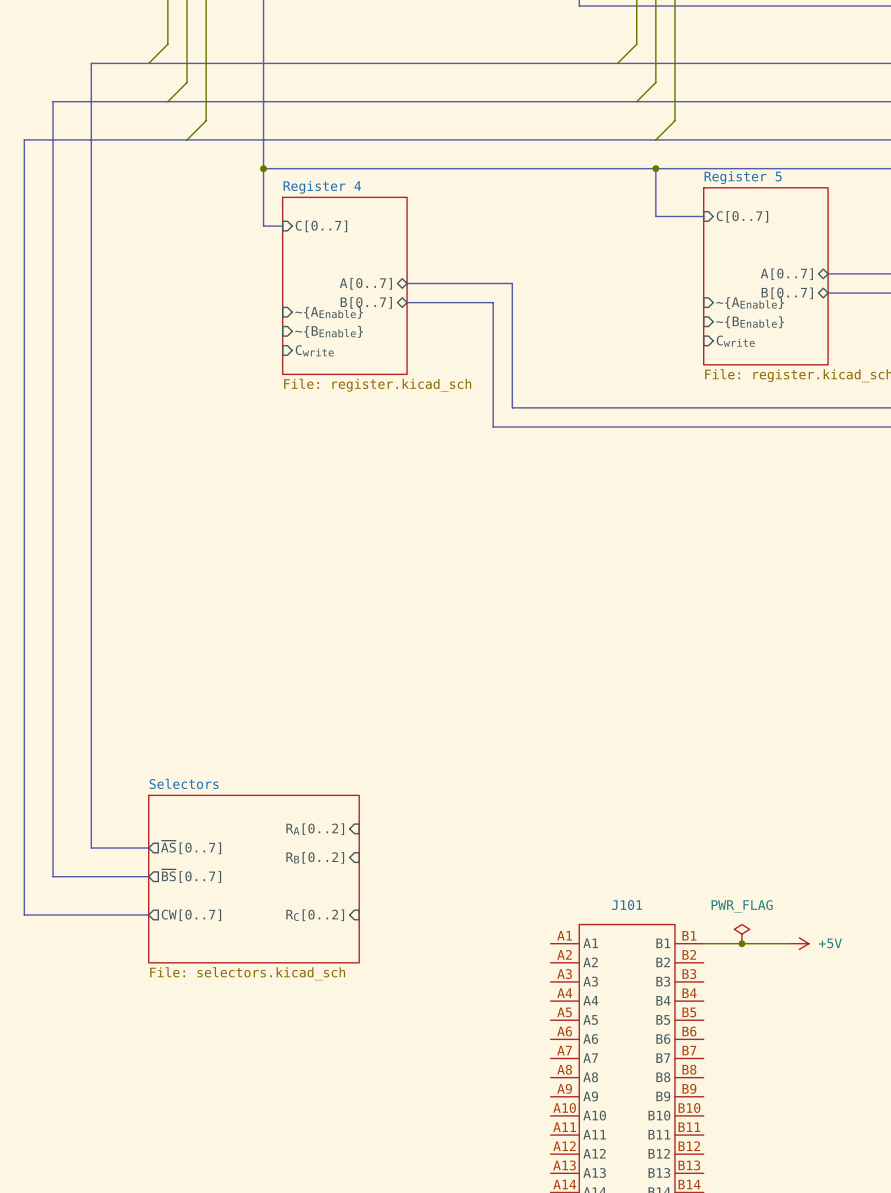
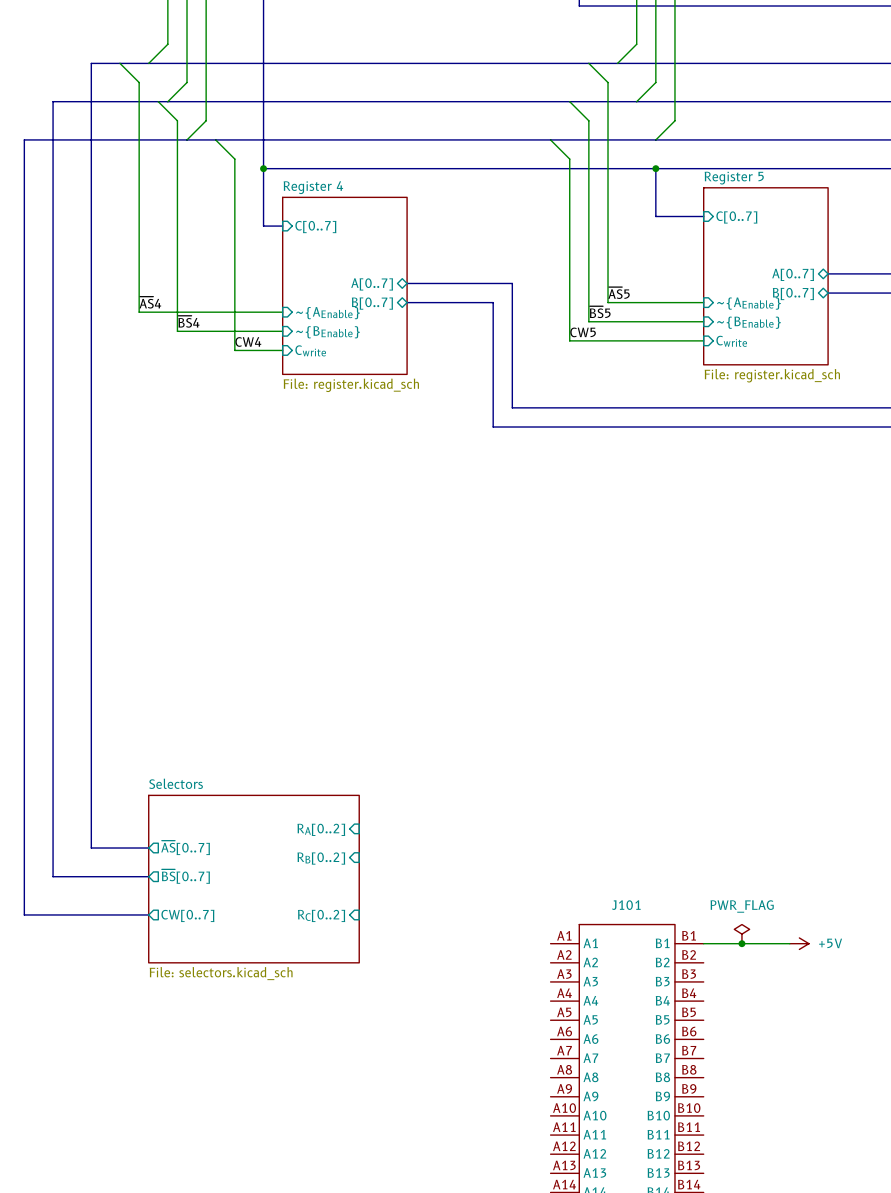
wire: none -> (120, 63) (139, 82) (139, 312) (282, 312)
wire: none -> (588, 63) (608, 82) (608, 302) (703, 302)
wire: none -> (158, 101) (177, 120) (177, 331) (282, 331)
wire: none -> (569, 101) (588, 120) (588, 321) (703, 321)
wire: none -> (215, 139) (234, 159) (234, 350) (282, 350)
wire: none -> (550, 139) (569, 159) (569, 340) (703, 340)
label: none -> ~{AS}5 (619, 293)
label: none -> ~{AS}4 (150, 302)
label: none -> ~{BS}5 (600, 312)
label: none -> ~{BS}4 (188, 321)
label: none -> CW5 (583, 332)
label: none -> CW4 (248, 341)

